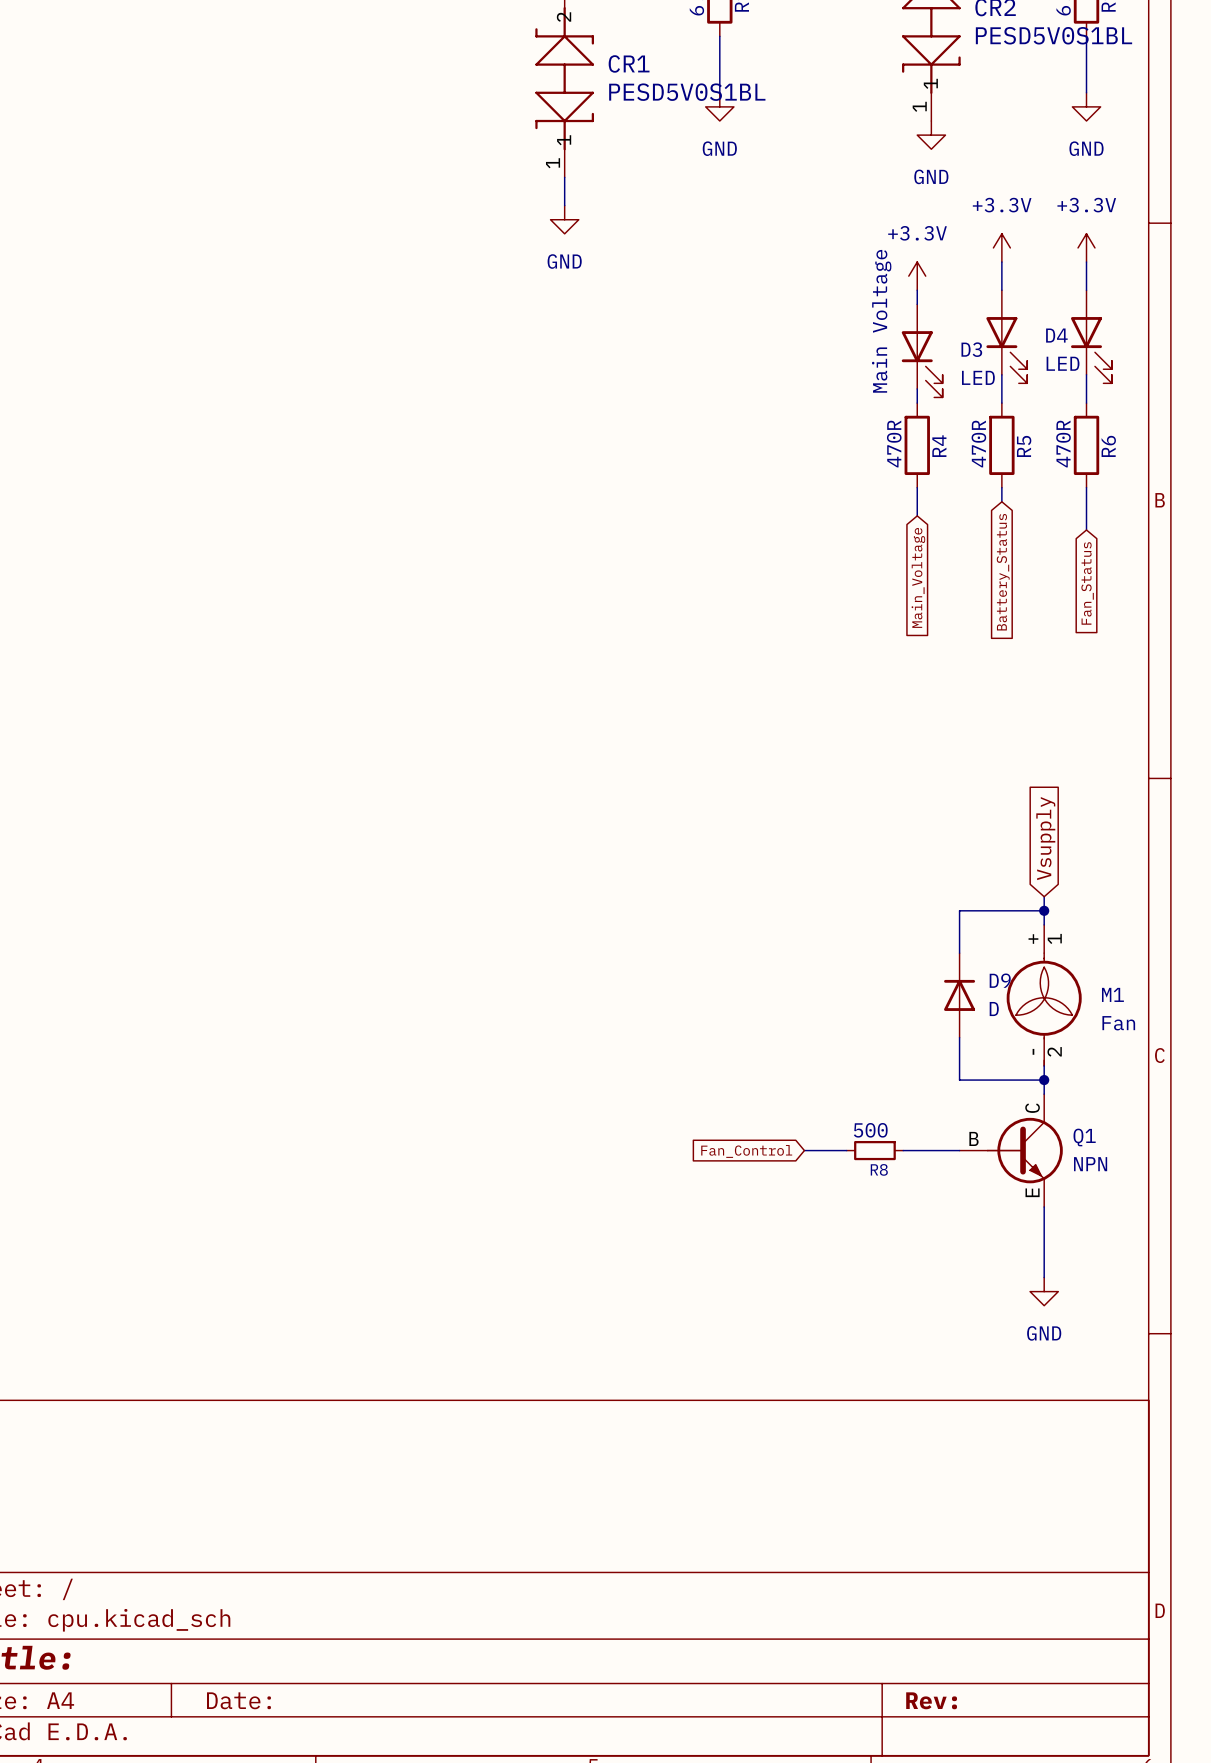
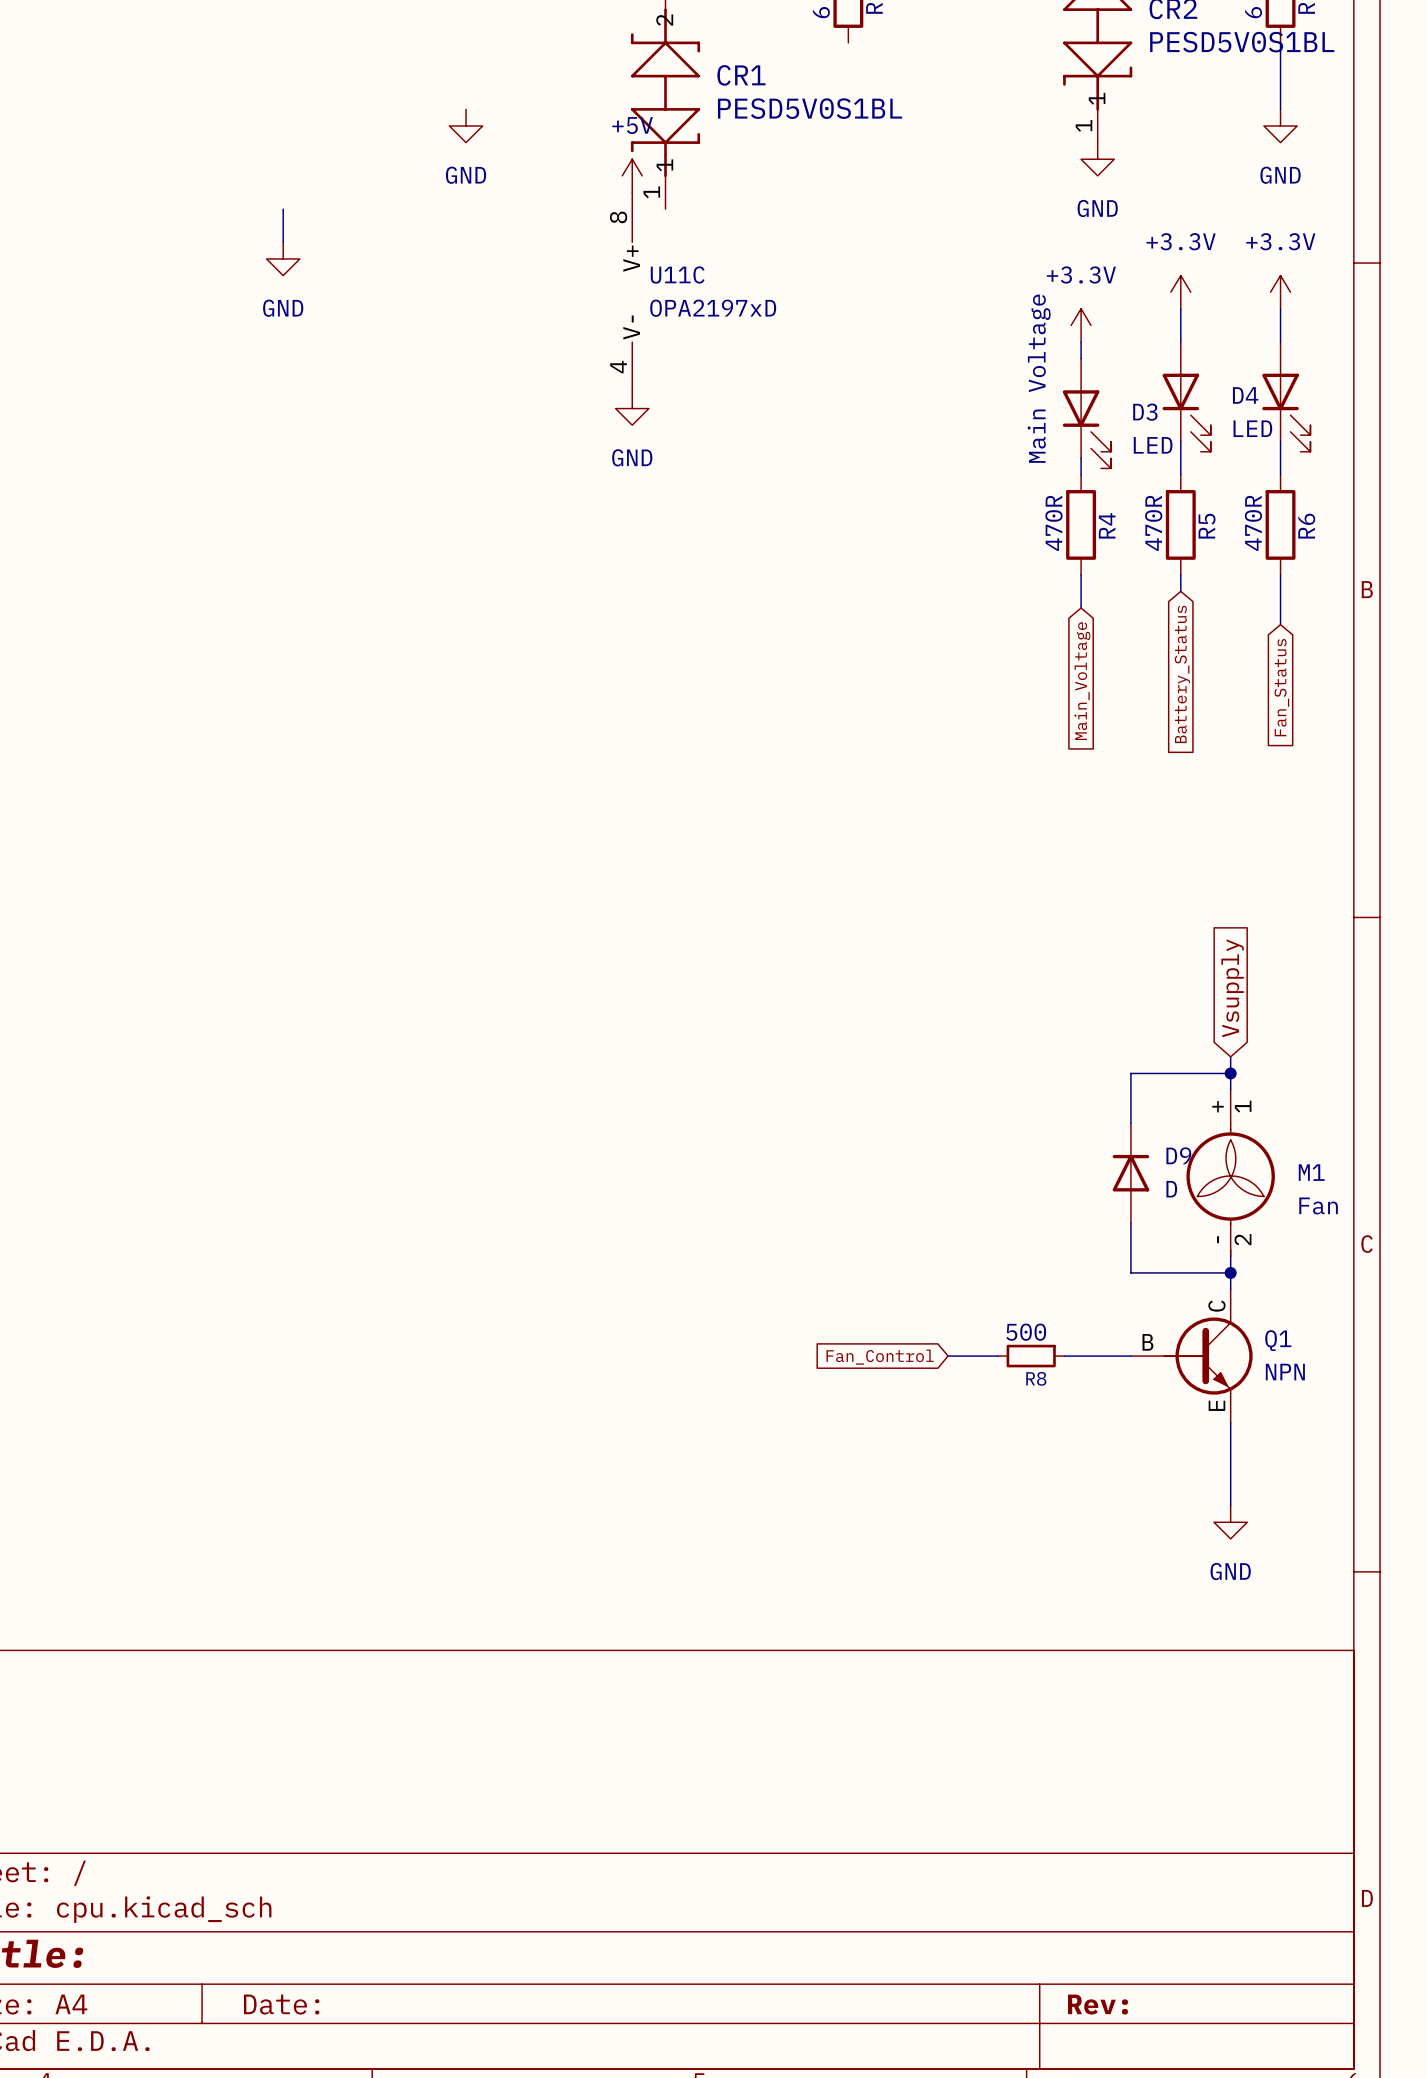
wire: (719, 36) (719, 92) -> none
power symbol: none -> GND (466, 125)
power symbol: GND (719, 106) -> none
power symbol: none -> +5V (632, 175)
wire: none -> (283, 209) (283, 242)
wire: (564, 177) (564, 205) -> none
power symbol: none -> GND (283, 258)
power symbol: GND (564, 219) -> none
U11C: none -> OPA2197xD (632, 292)
power symbol: none -> GND (632, 408)

